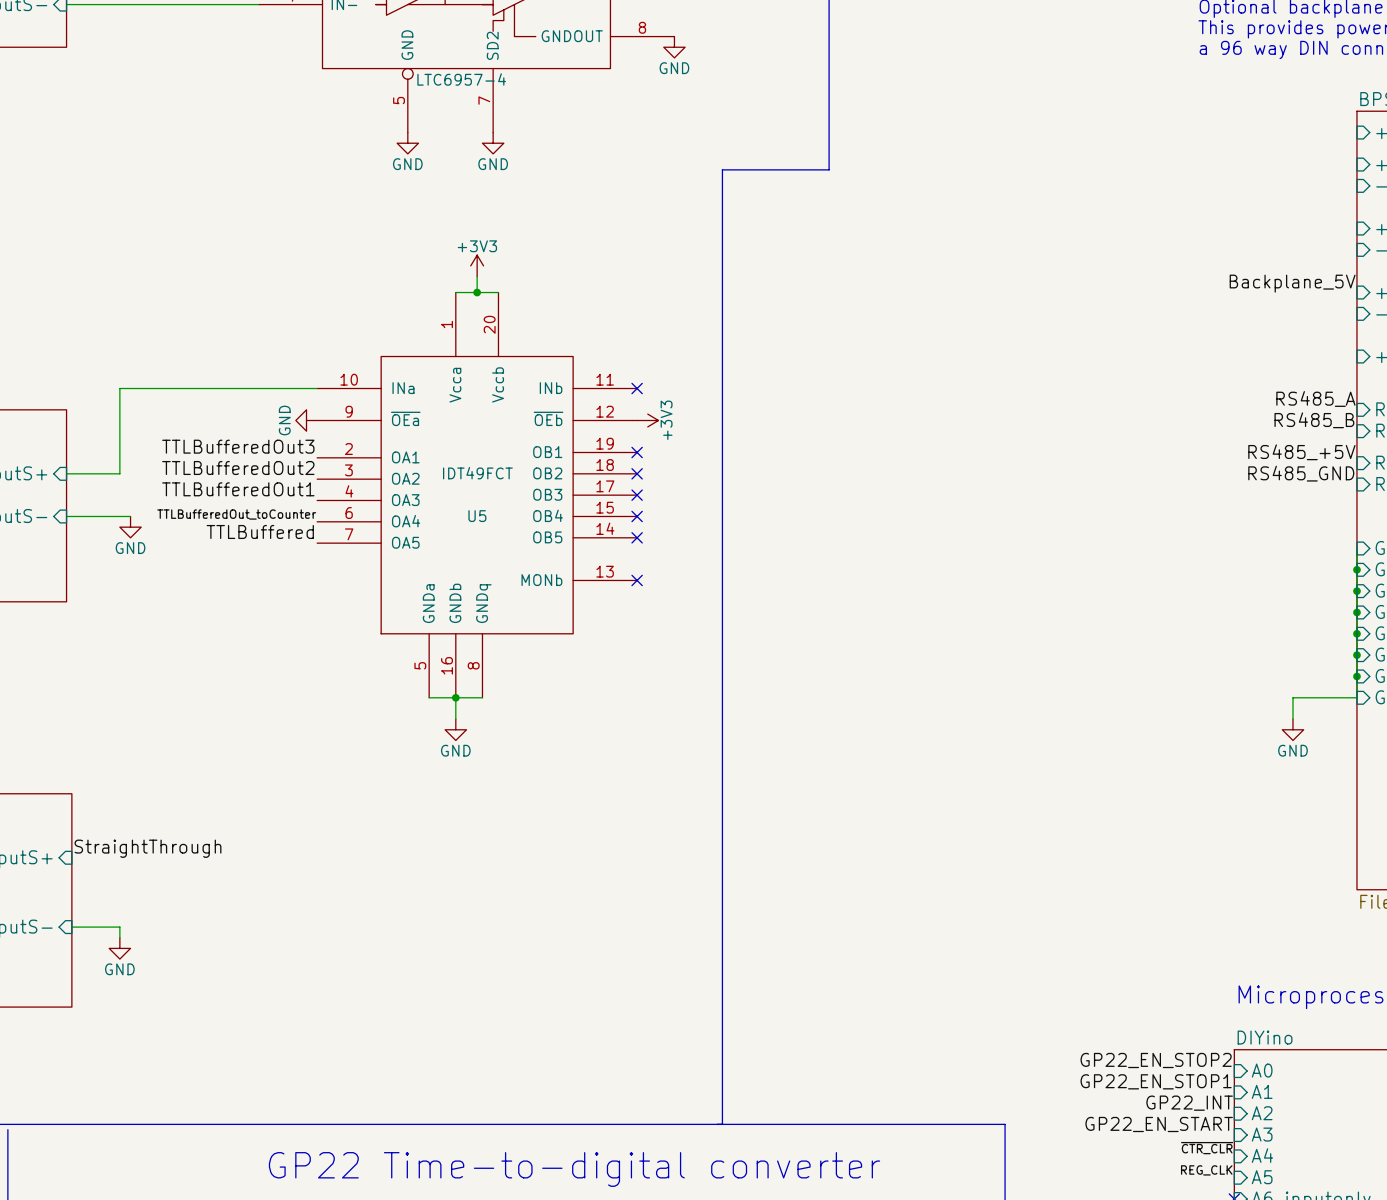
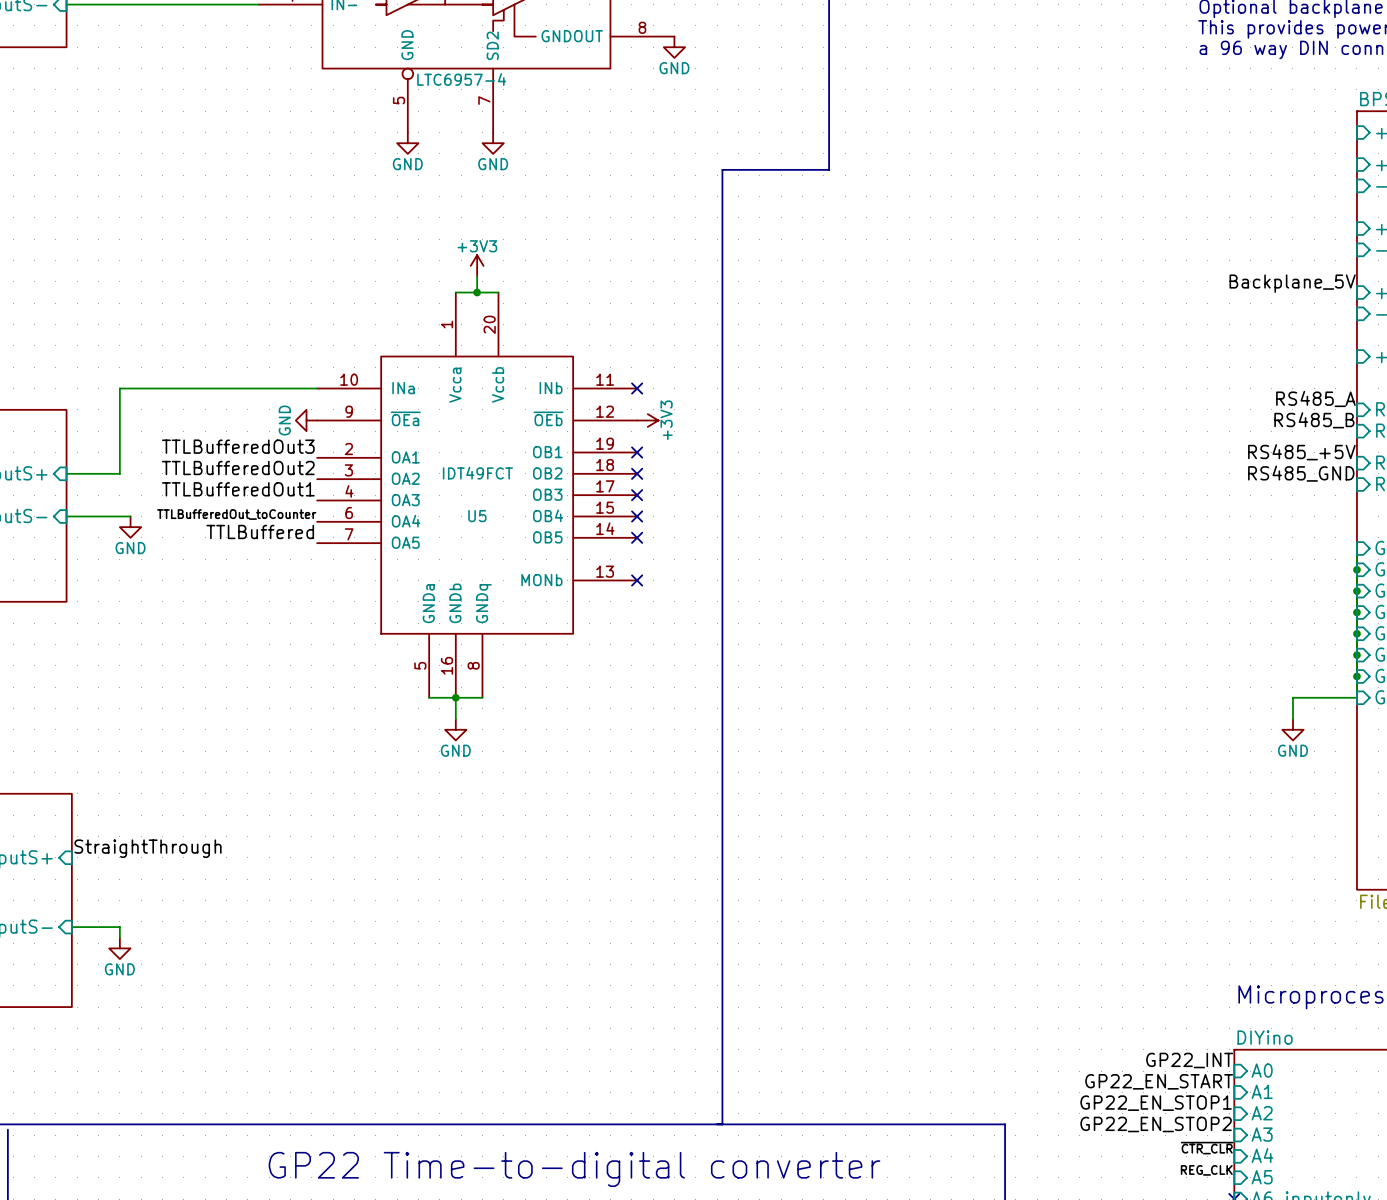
label: GP22_EN_STOP2 (1156, 1060) -> GP22_INT (1189, 1060)
label: GP22_EN_STOP1 (1156, 1081) -> GP22_EN_START (1159, 1081)
label: GP22_INT (1189, 1103) -> GP22_EN_STOP1 (1156, 1103)
label: GP22_EN_START (1159, 1124) -> GP22_EN_STOP2 (1156, 1124)

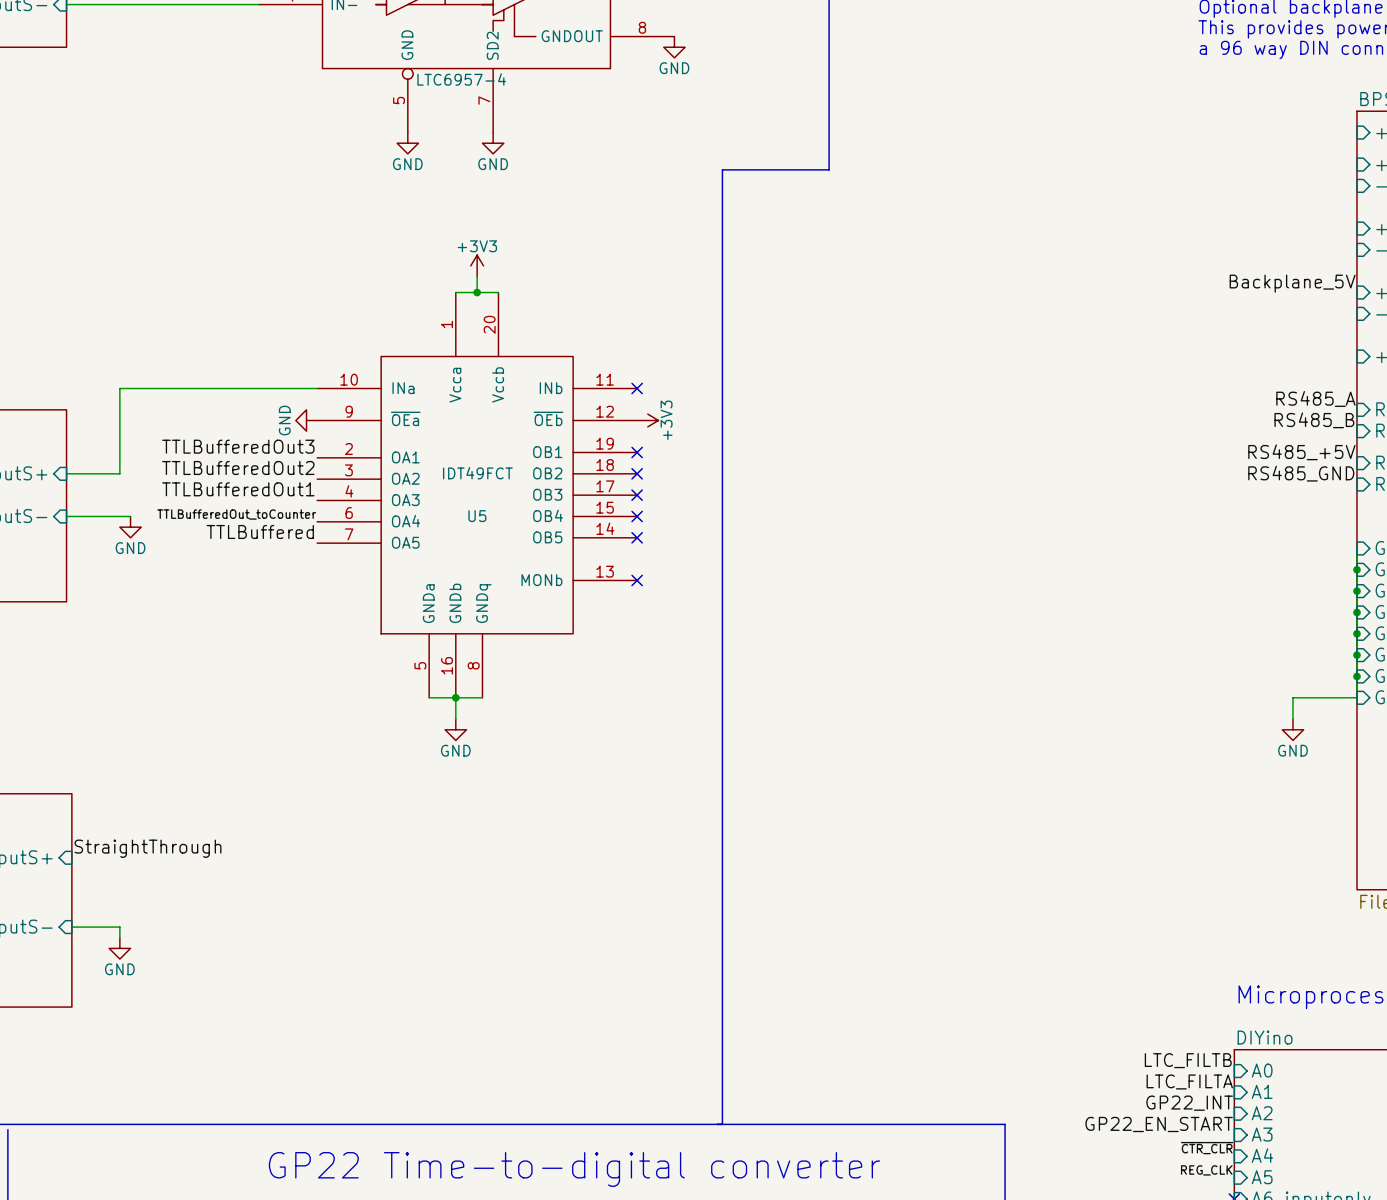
label: GP22_INT (1189, 1060) -> LTC_FILTB (1188, 1060)
label: GP22_EN_START (1159, 1081) -> LTC_FILTA (1189, 1081)
label: GP22_EN_STOP1 (1156, 1103) -> GP22_INT (1189, 1103)
label: GP22_EN_STOP2 (1156, 1124) -> GP22_EN_START (1159, 1124)

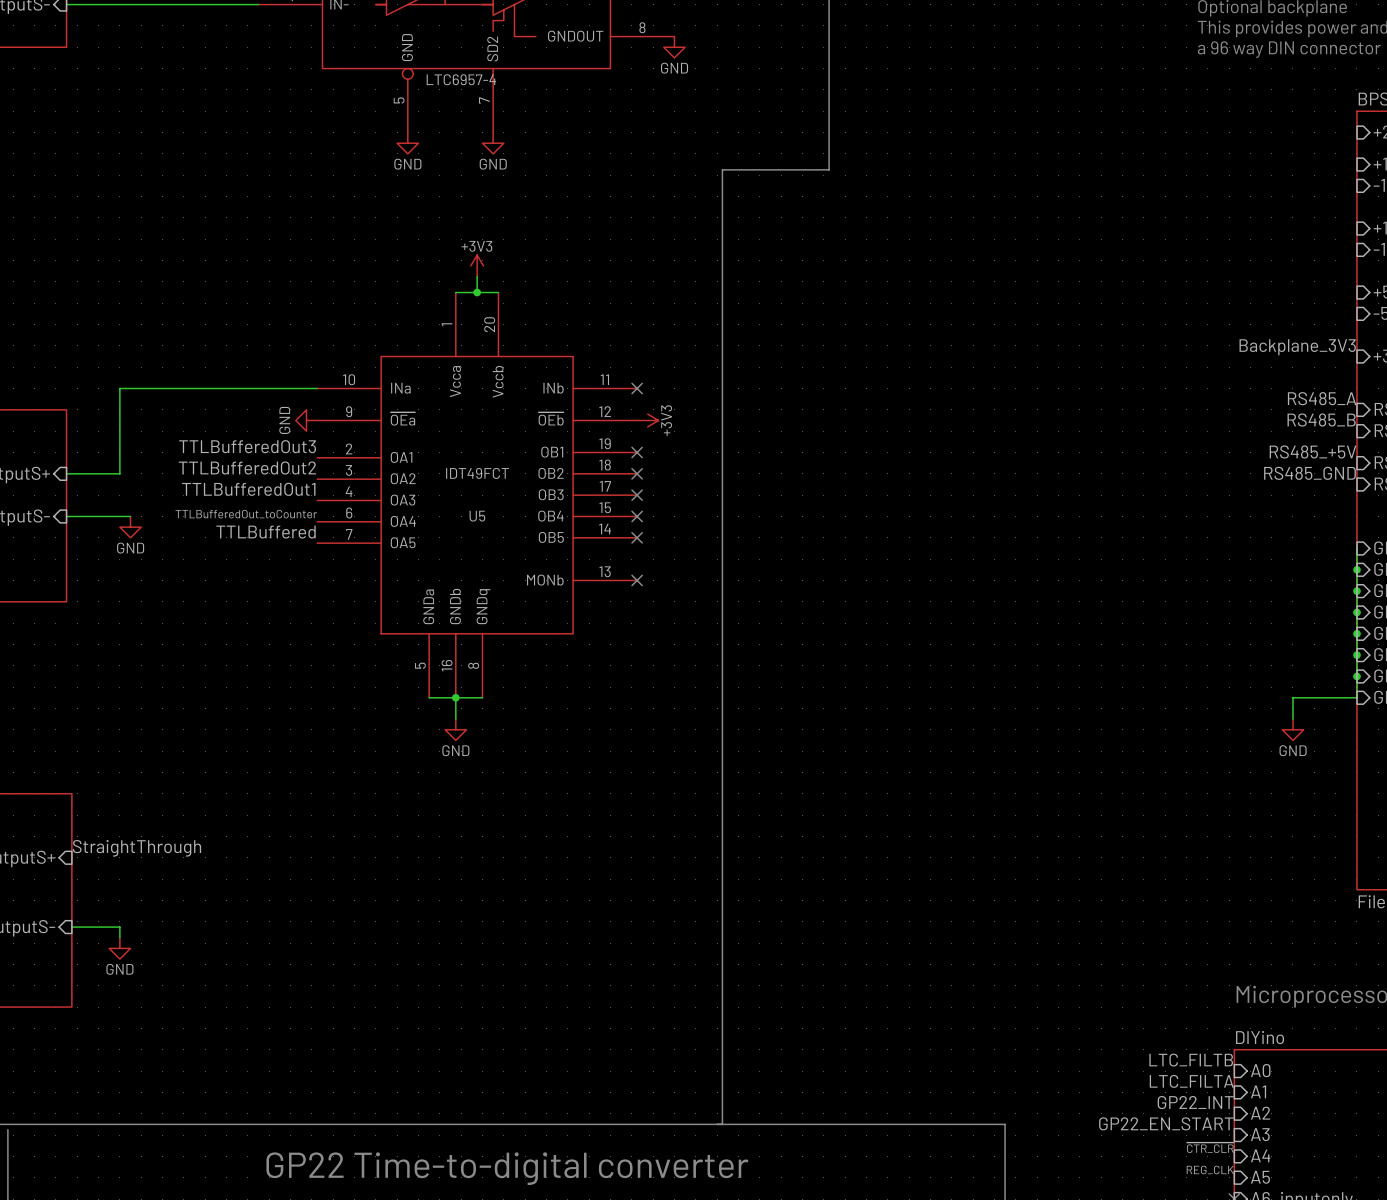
label: Backplane_5V (1292, 283) -> none
label: none -> Backplane_3V3 (1297, 347)

